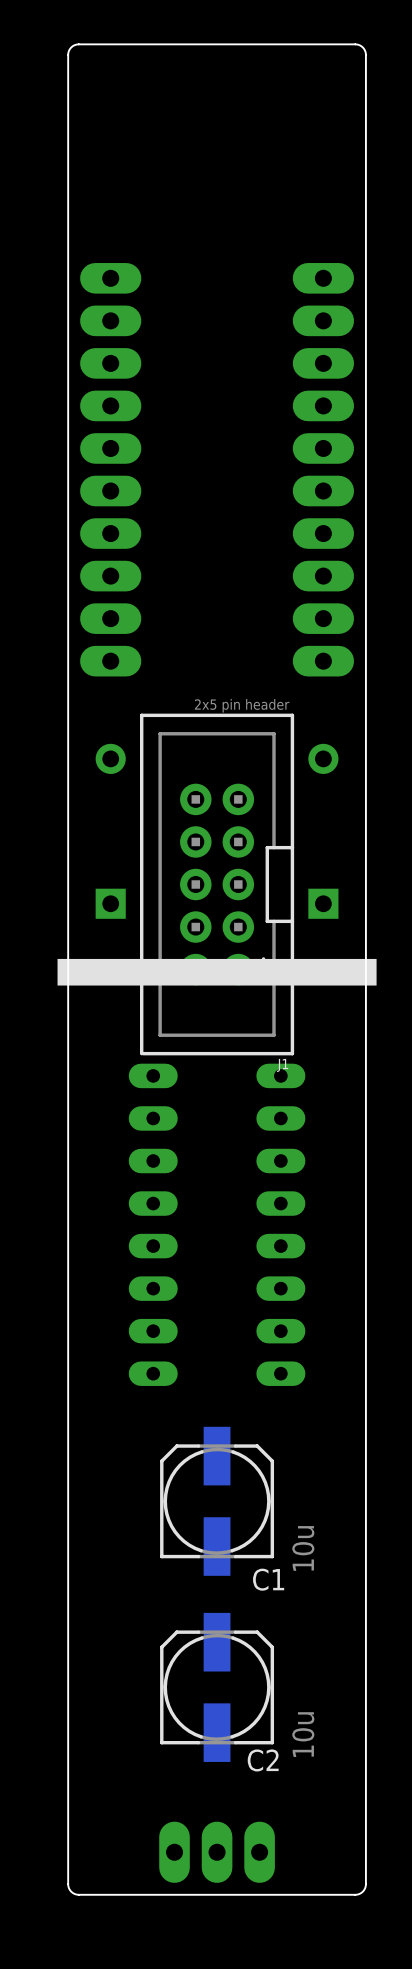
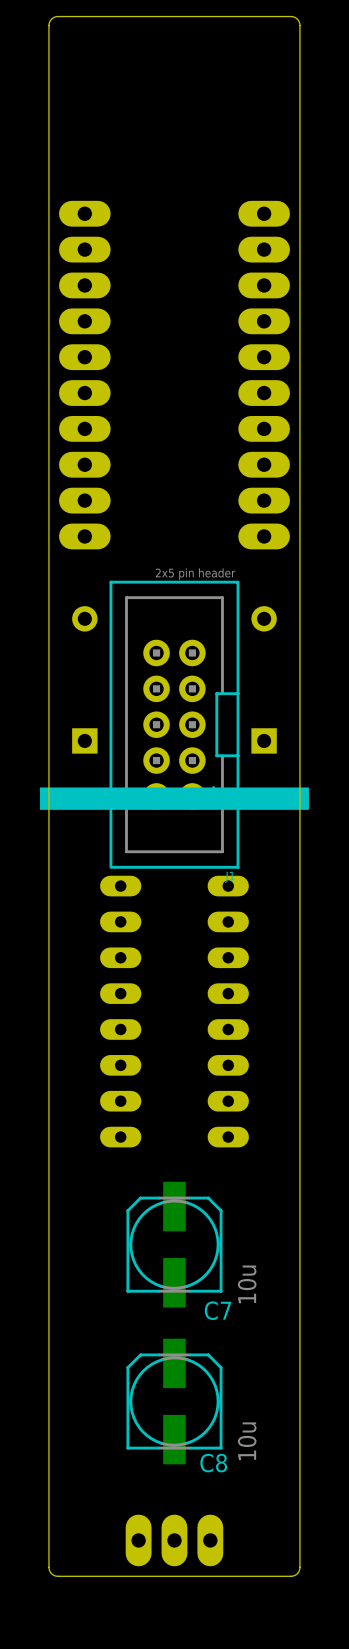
C1 name: C1 (268, 1579) -> C7 (217, 1310)
C2 name: C2 (263, 1760) -> C8 (213, 1463)

